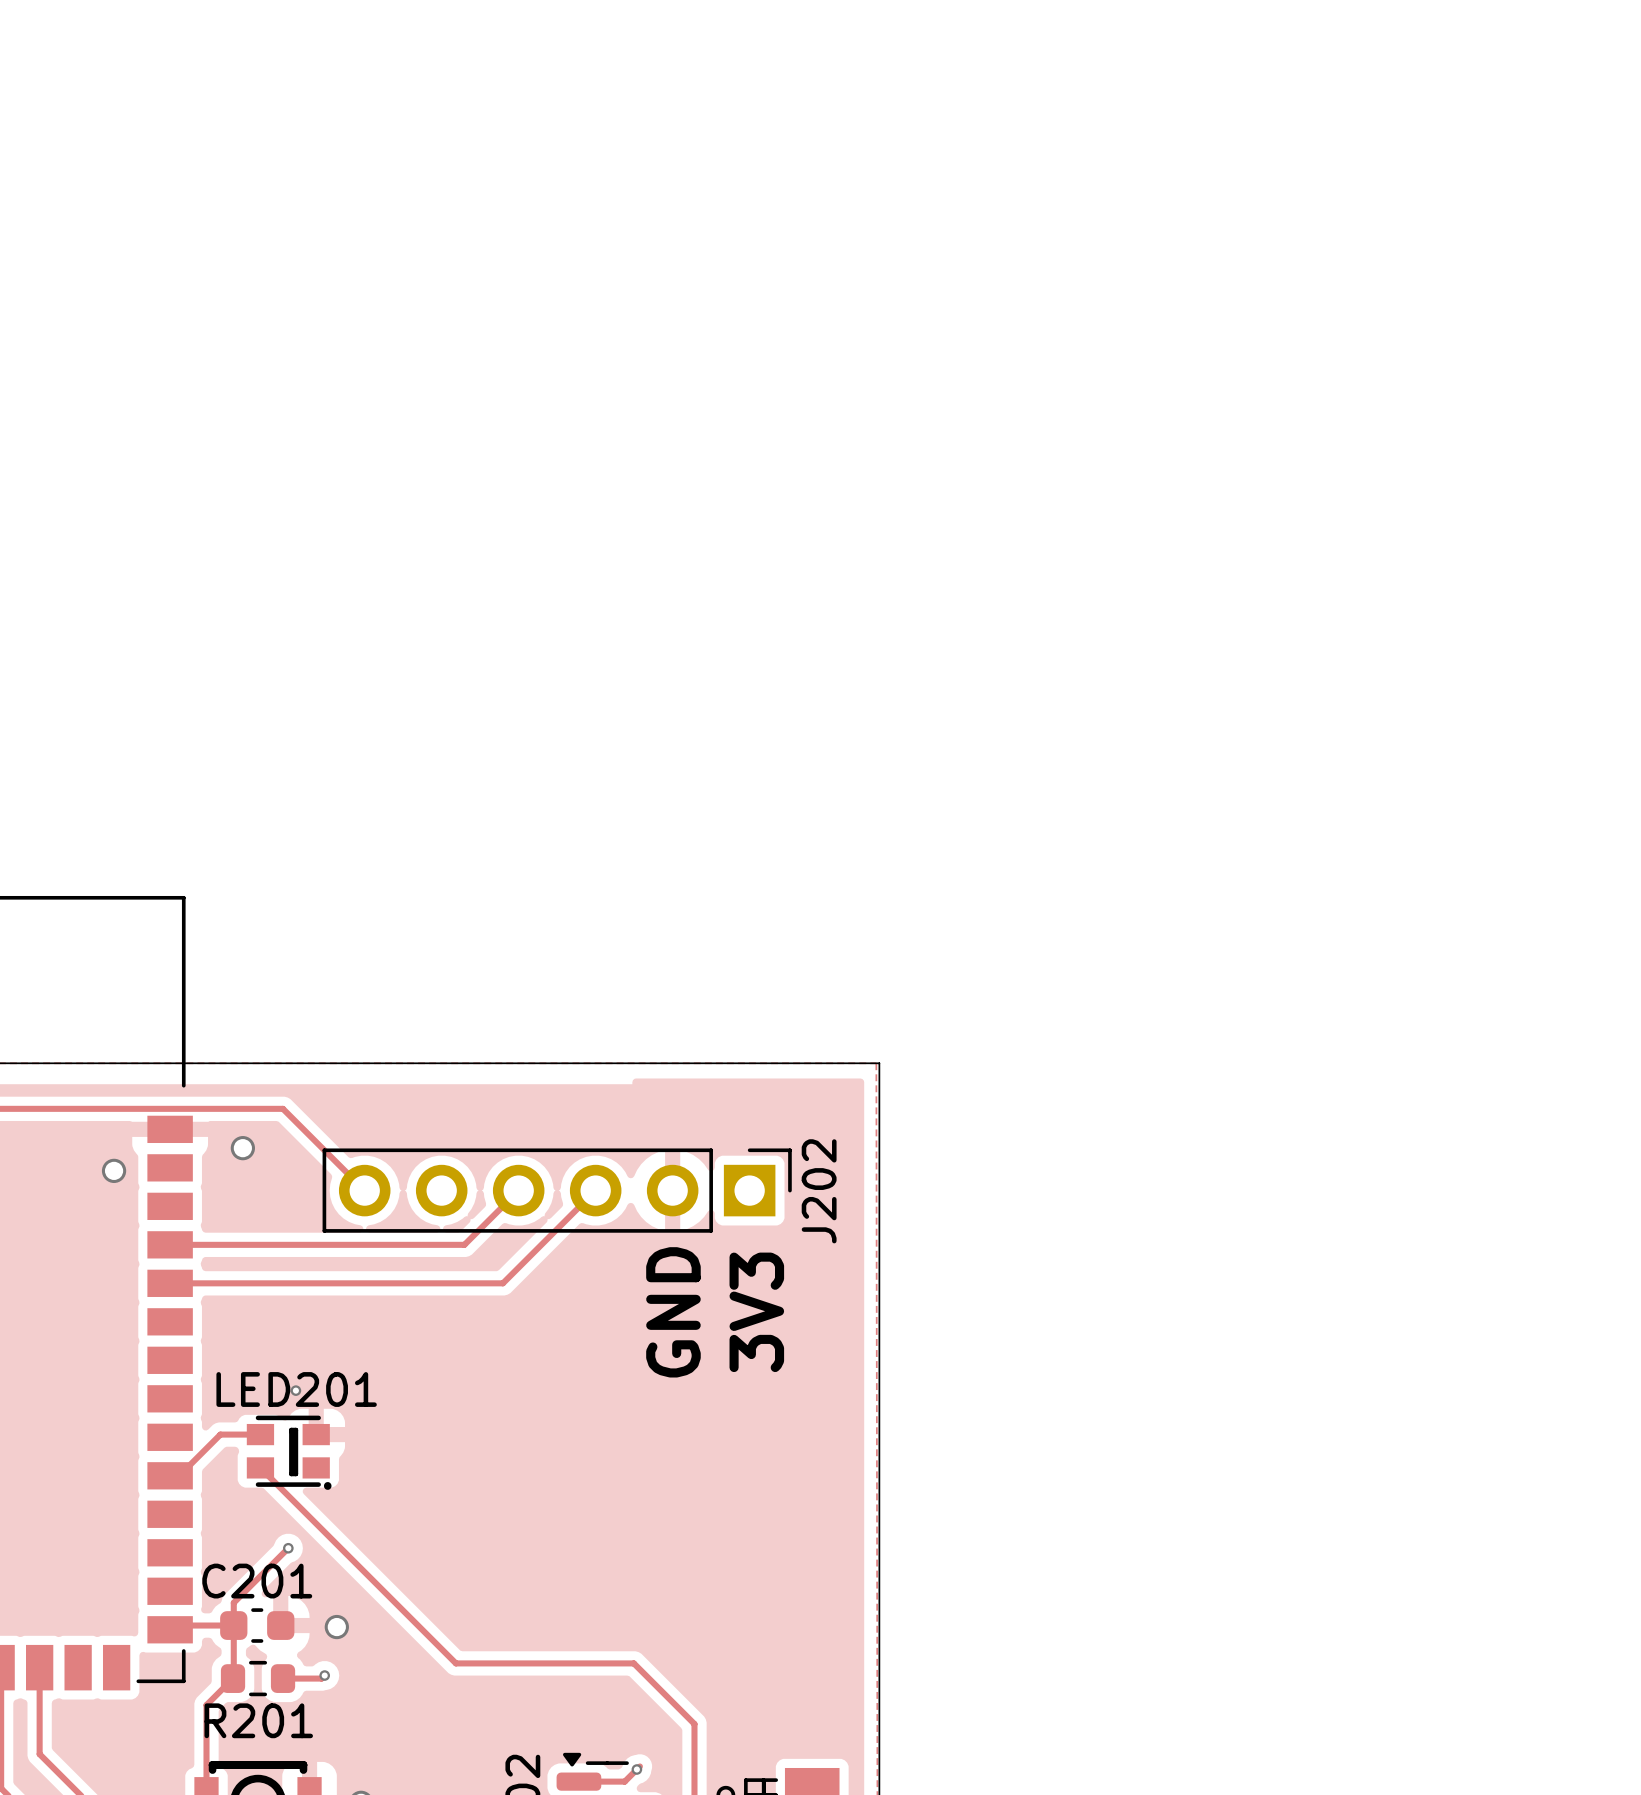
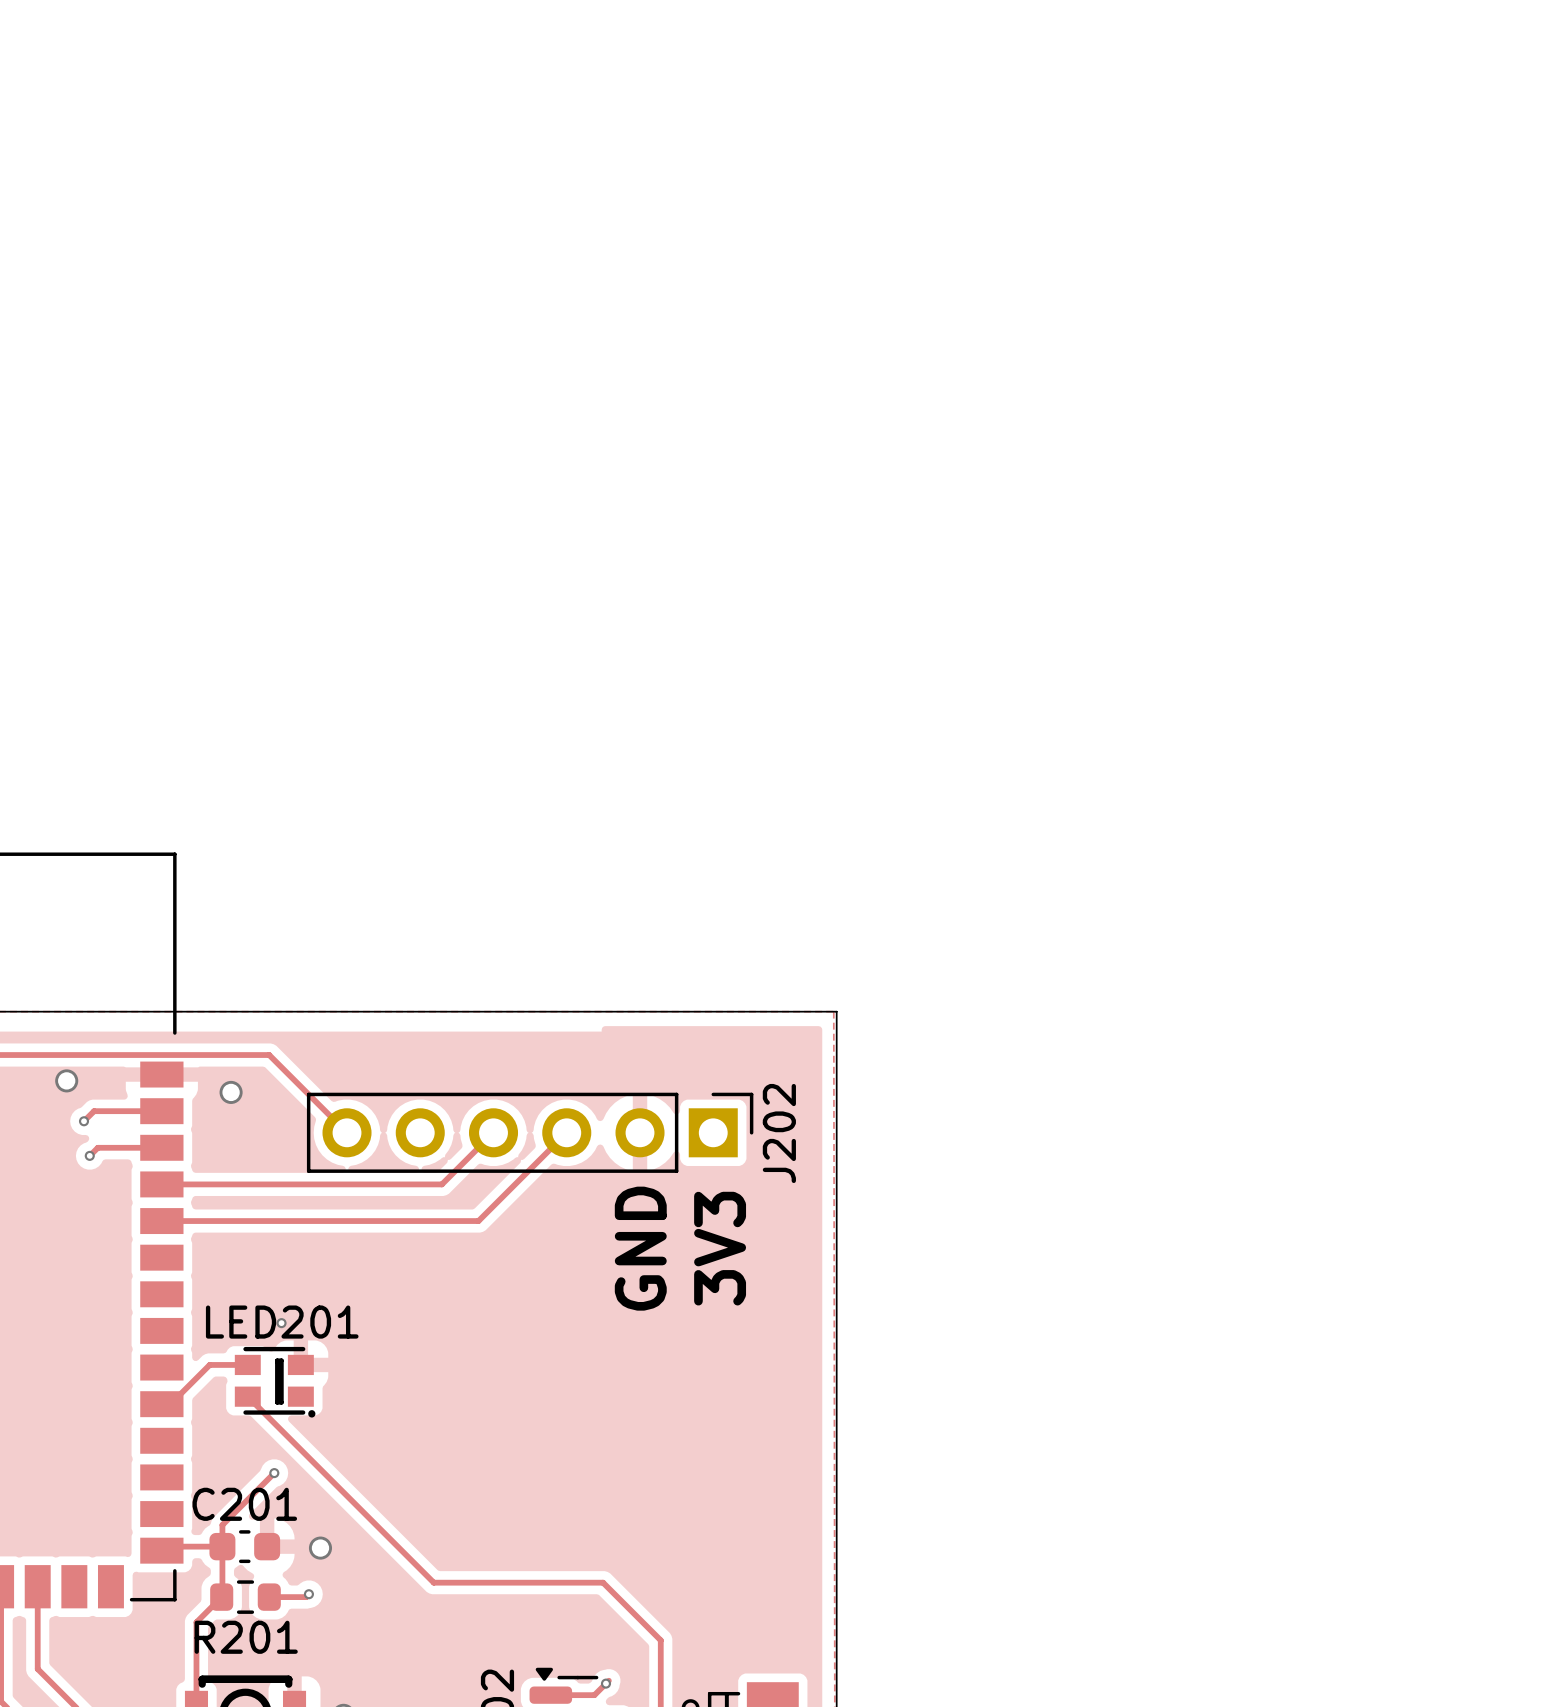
track: none -> (161, 1111) (94, 1111) (84, 1121)
via position: (114, 1170) -> (66, 1080)
via: none -> (84, 1121)
track: none -> (161, 1147) (97, 1147) (89, 1155)
via: none -> (89, 1155)

